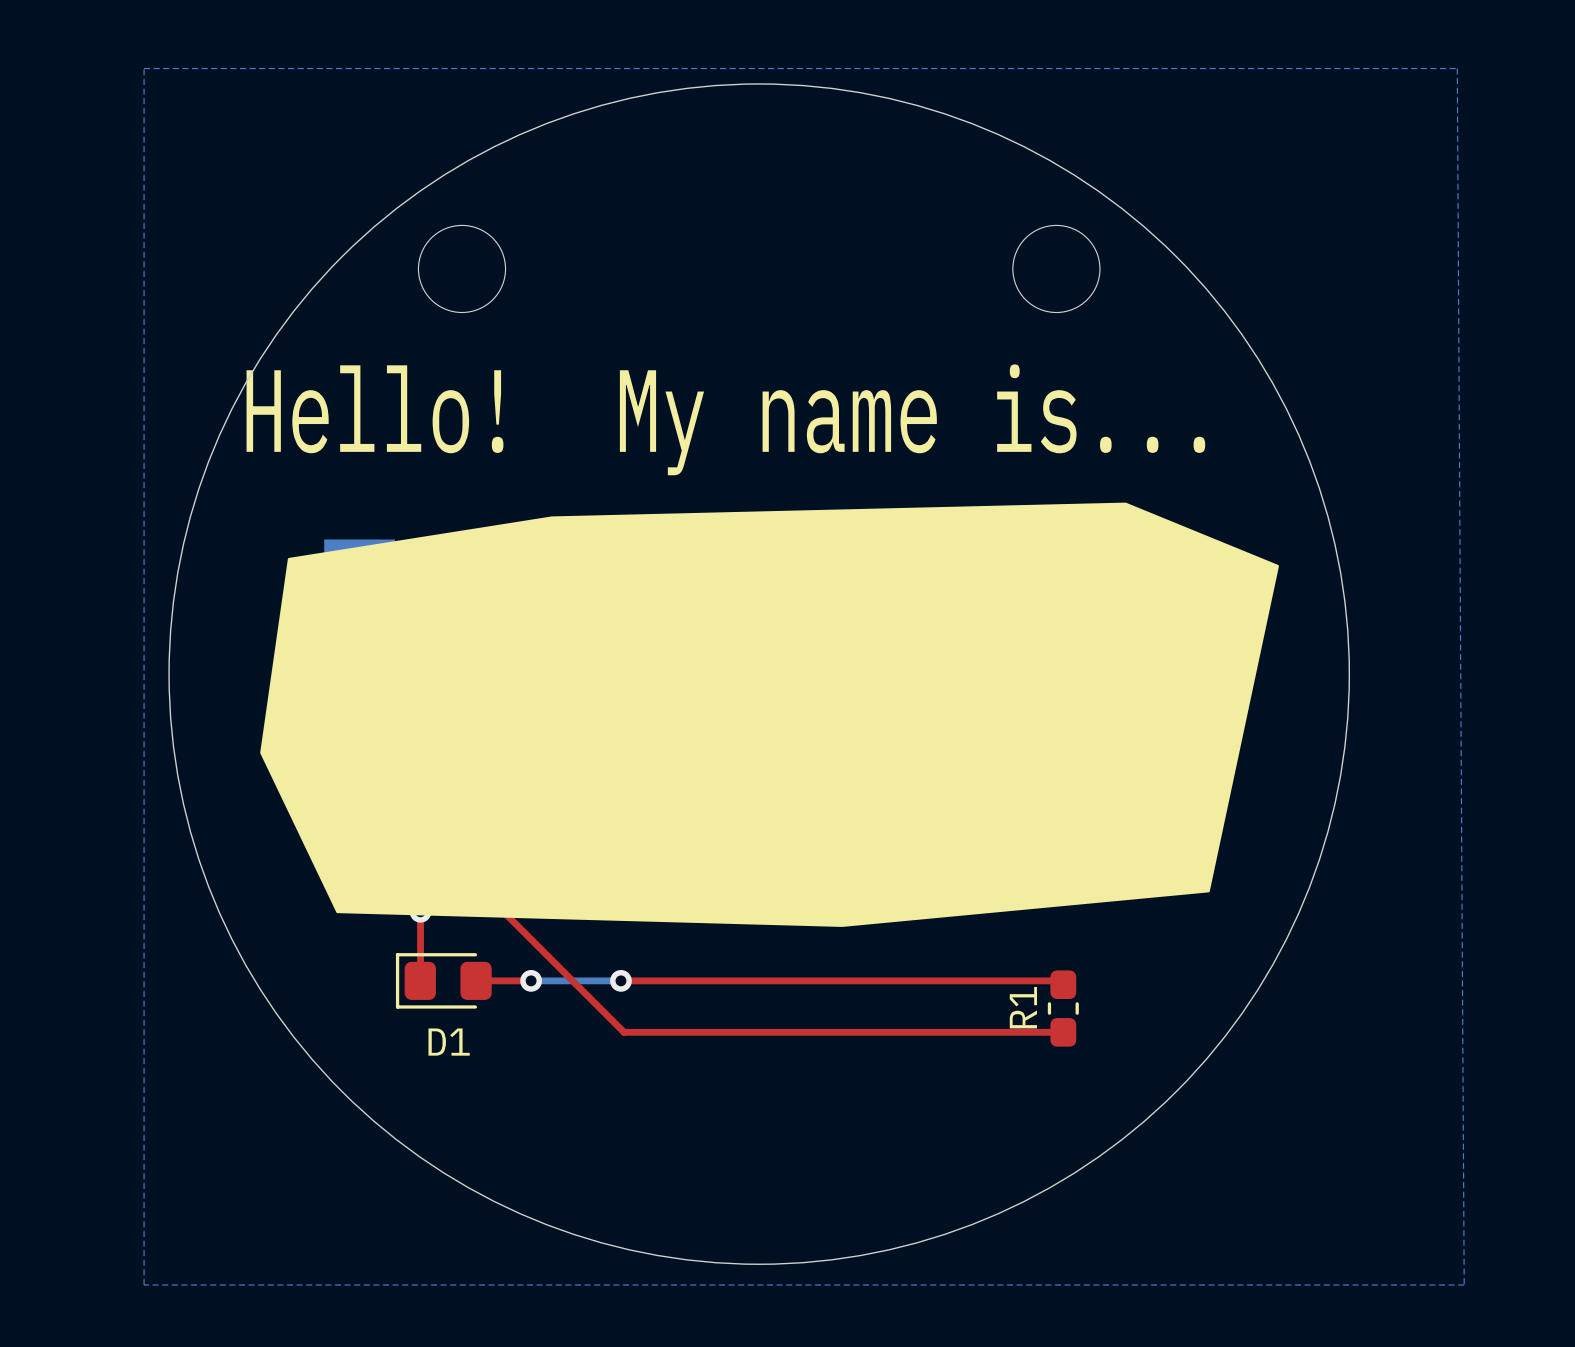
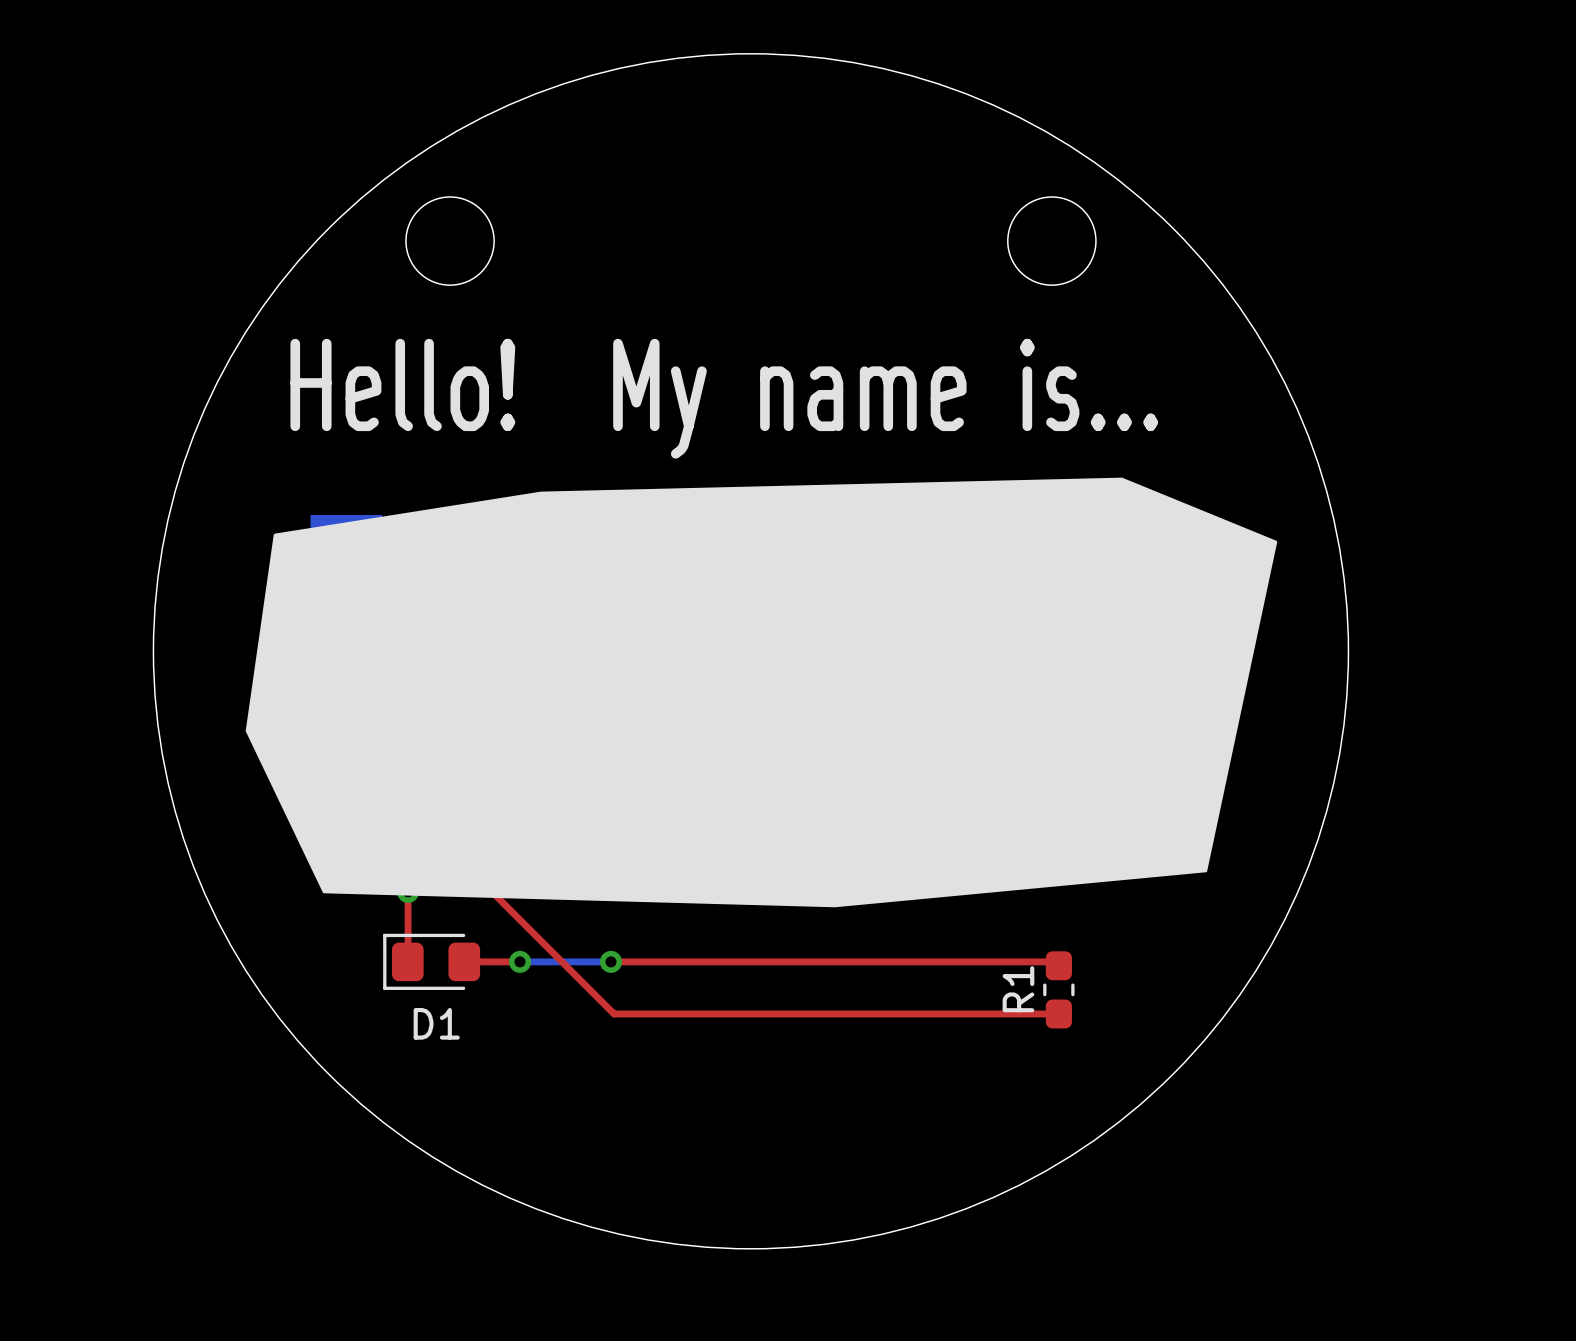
bottom zone outline: (144, 68) (144, 1284) (1464, 1284) (1457, 68) (144, 68) -> none

